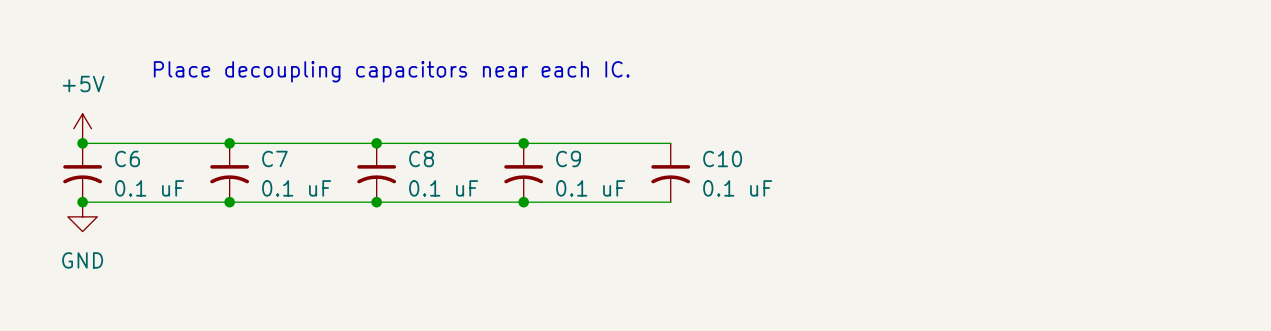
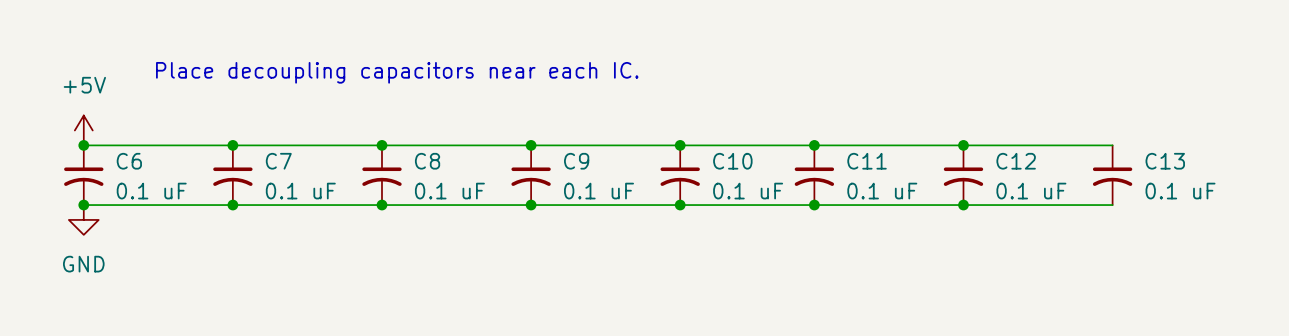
wire: none -> (680, 145) (1112, 145)
junction: none -> (680, 145)
junction: none -> (814, 145)
junction: none -> (963, 145)
C11: none -> 0.1 uF (814, 175)
C12: none -> 0.1 uF (963, 175)
C13: none -> 0.1 uF (1112, 175)
wire: none -> (680, 205) (1112, 205)
junction: none -> (680, 205)
junction: none -> (814, 205)
junction: none -> (963, 205)

